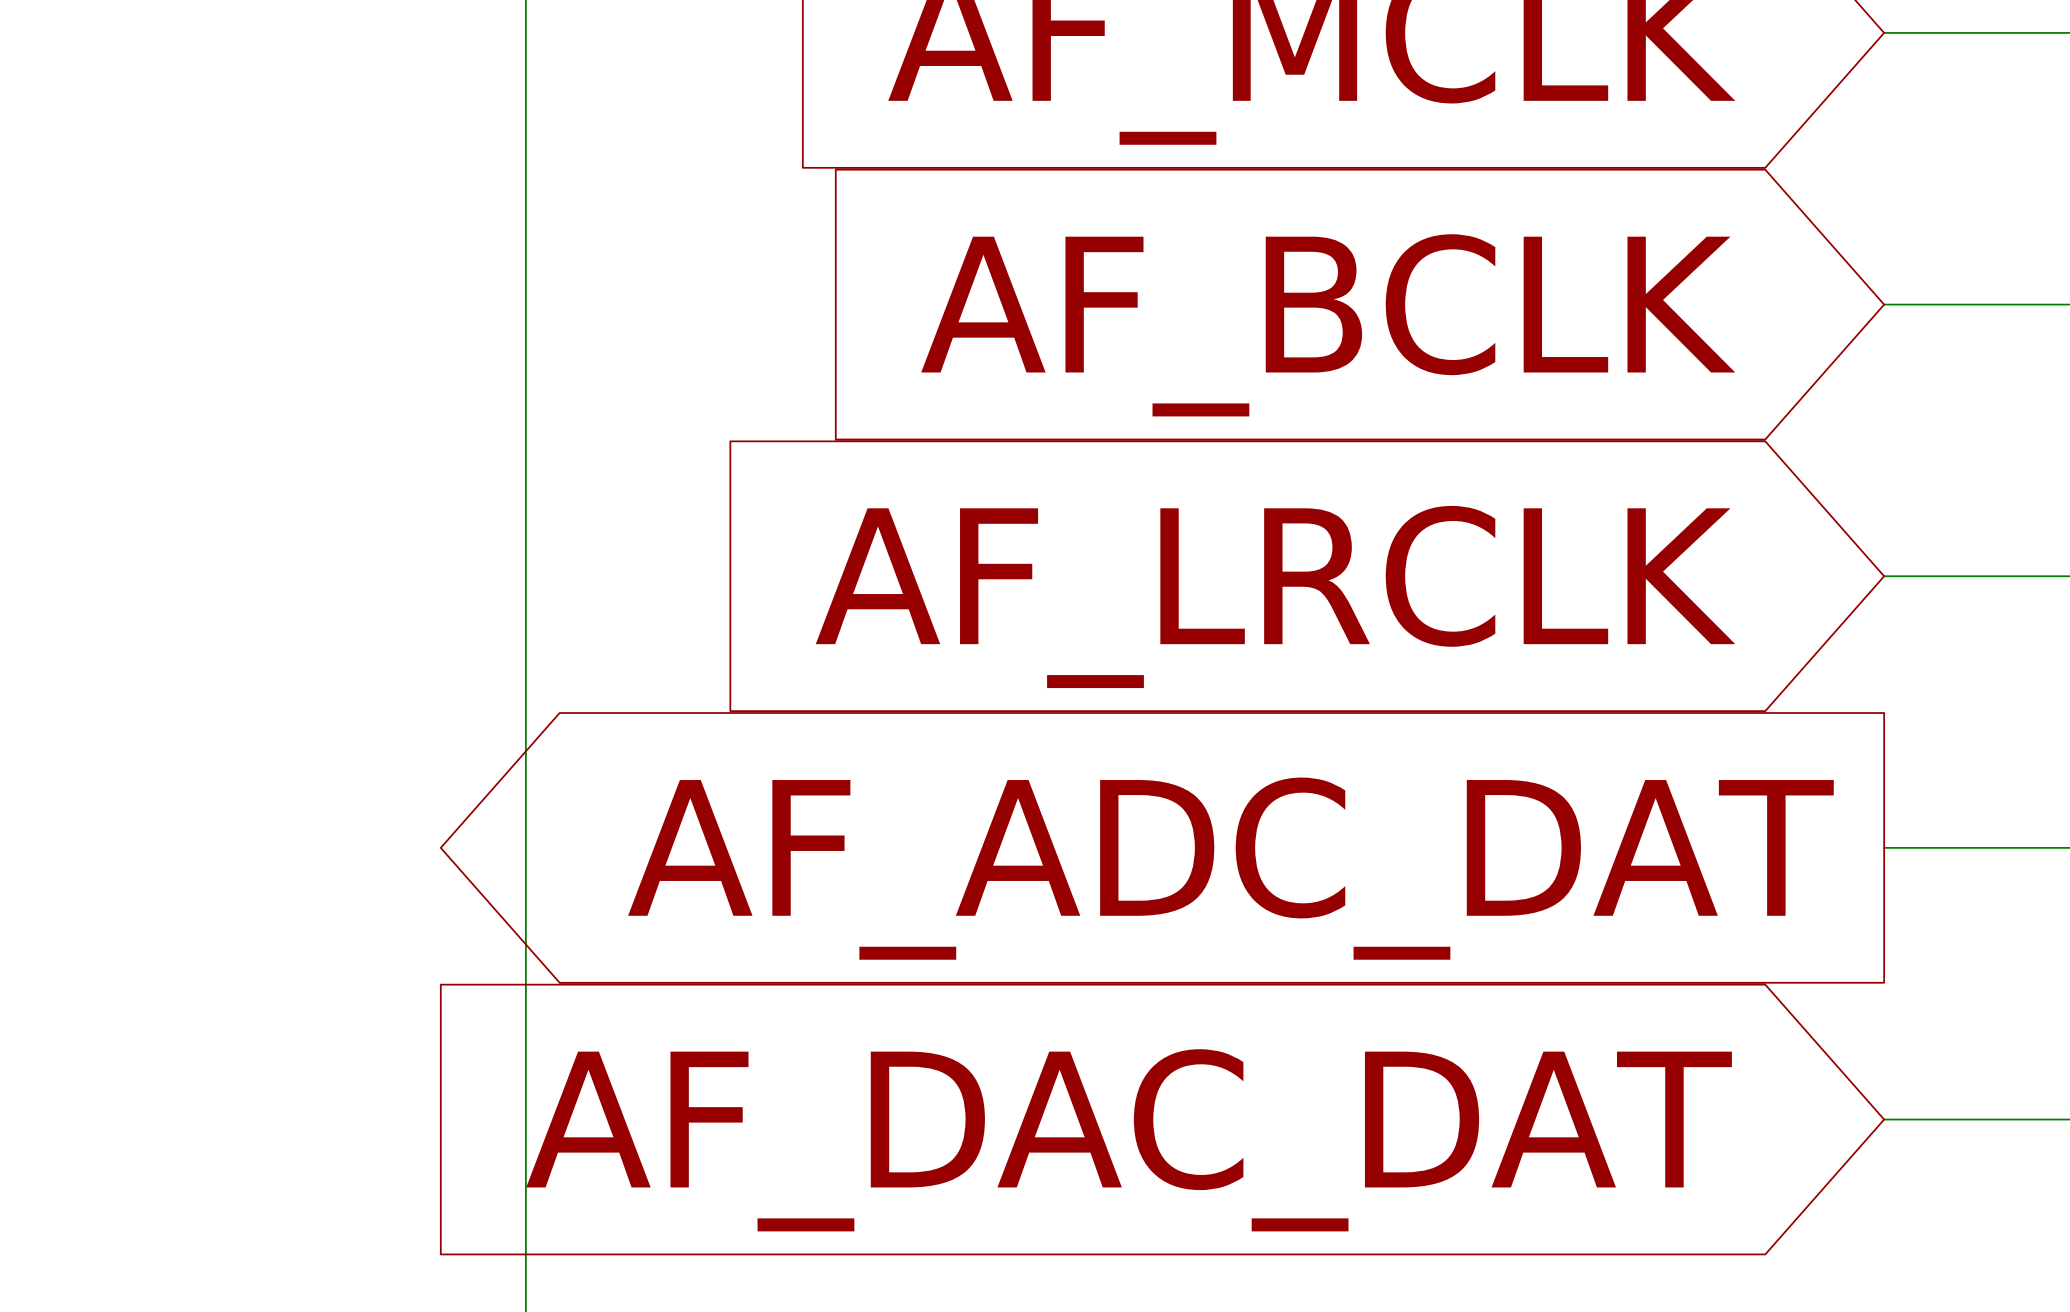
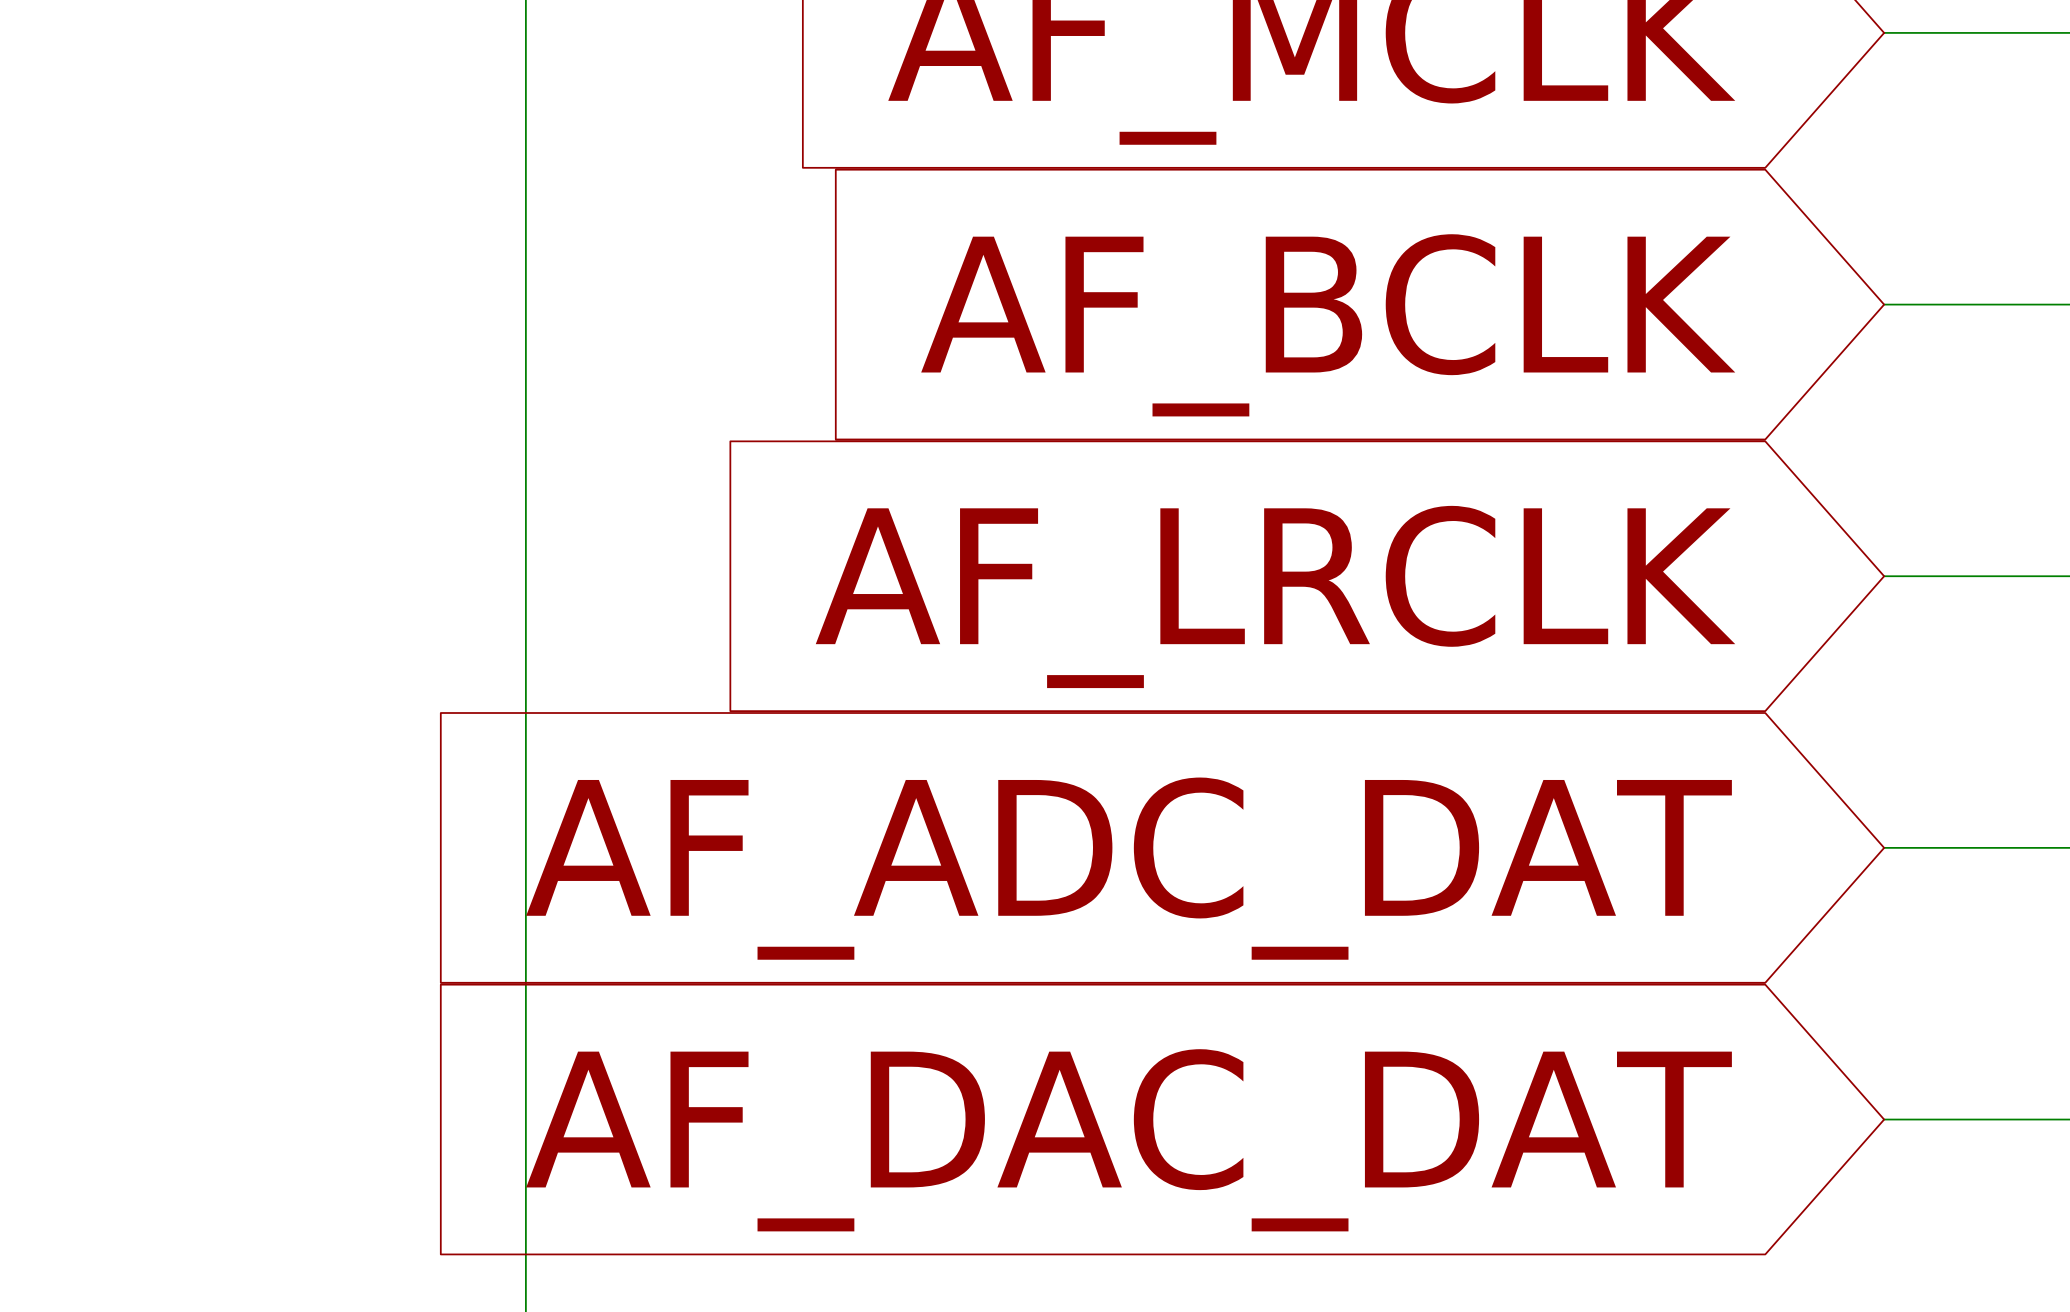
global label shape: output (1230, 868) -> input (1129, 868)

